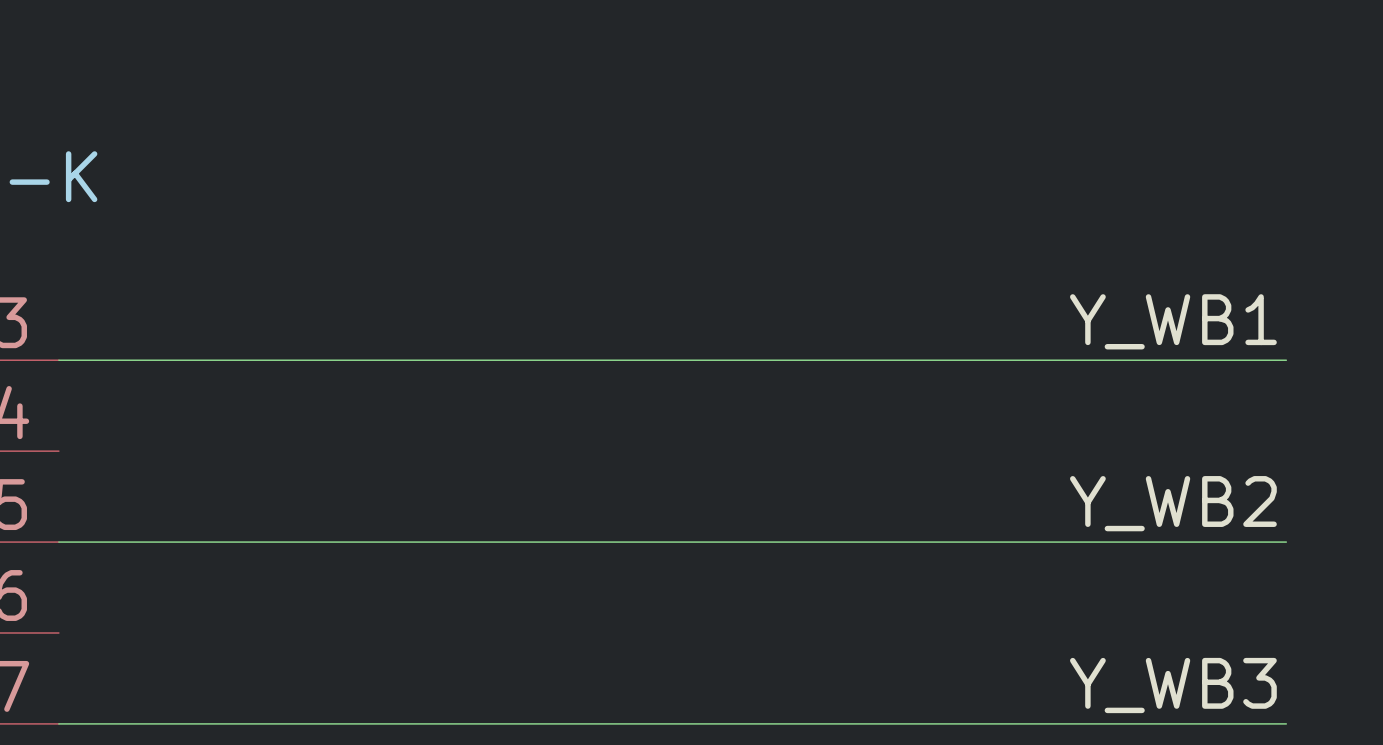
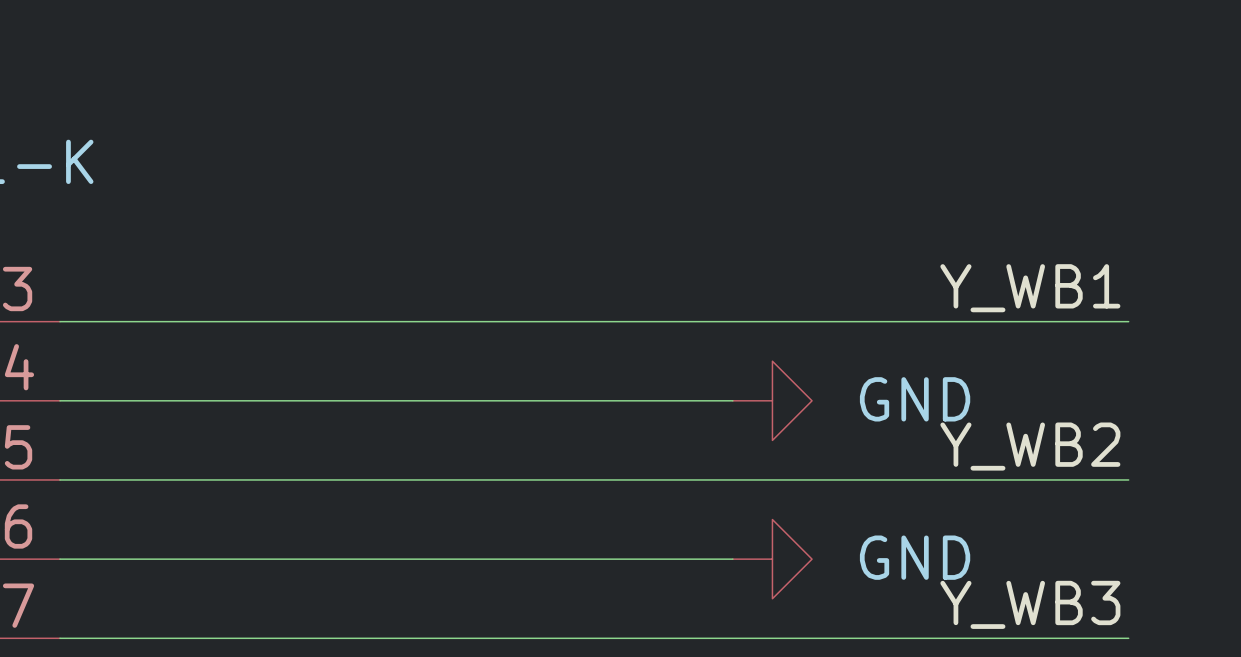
wire: none -> (59, 400) (732, 400)
power symbol: none -> GND (772, 400)
wire: none -> (59, 559) (732, 559)
power symbol: none -> GND (772, 559)

